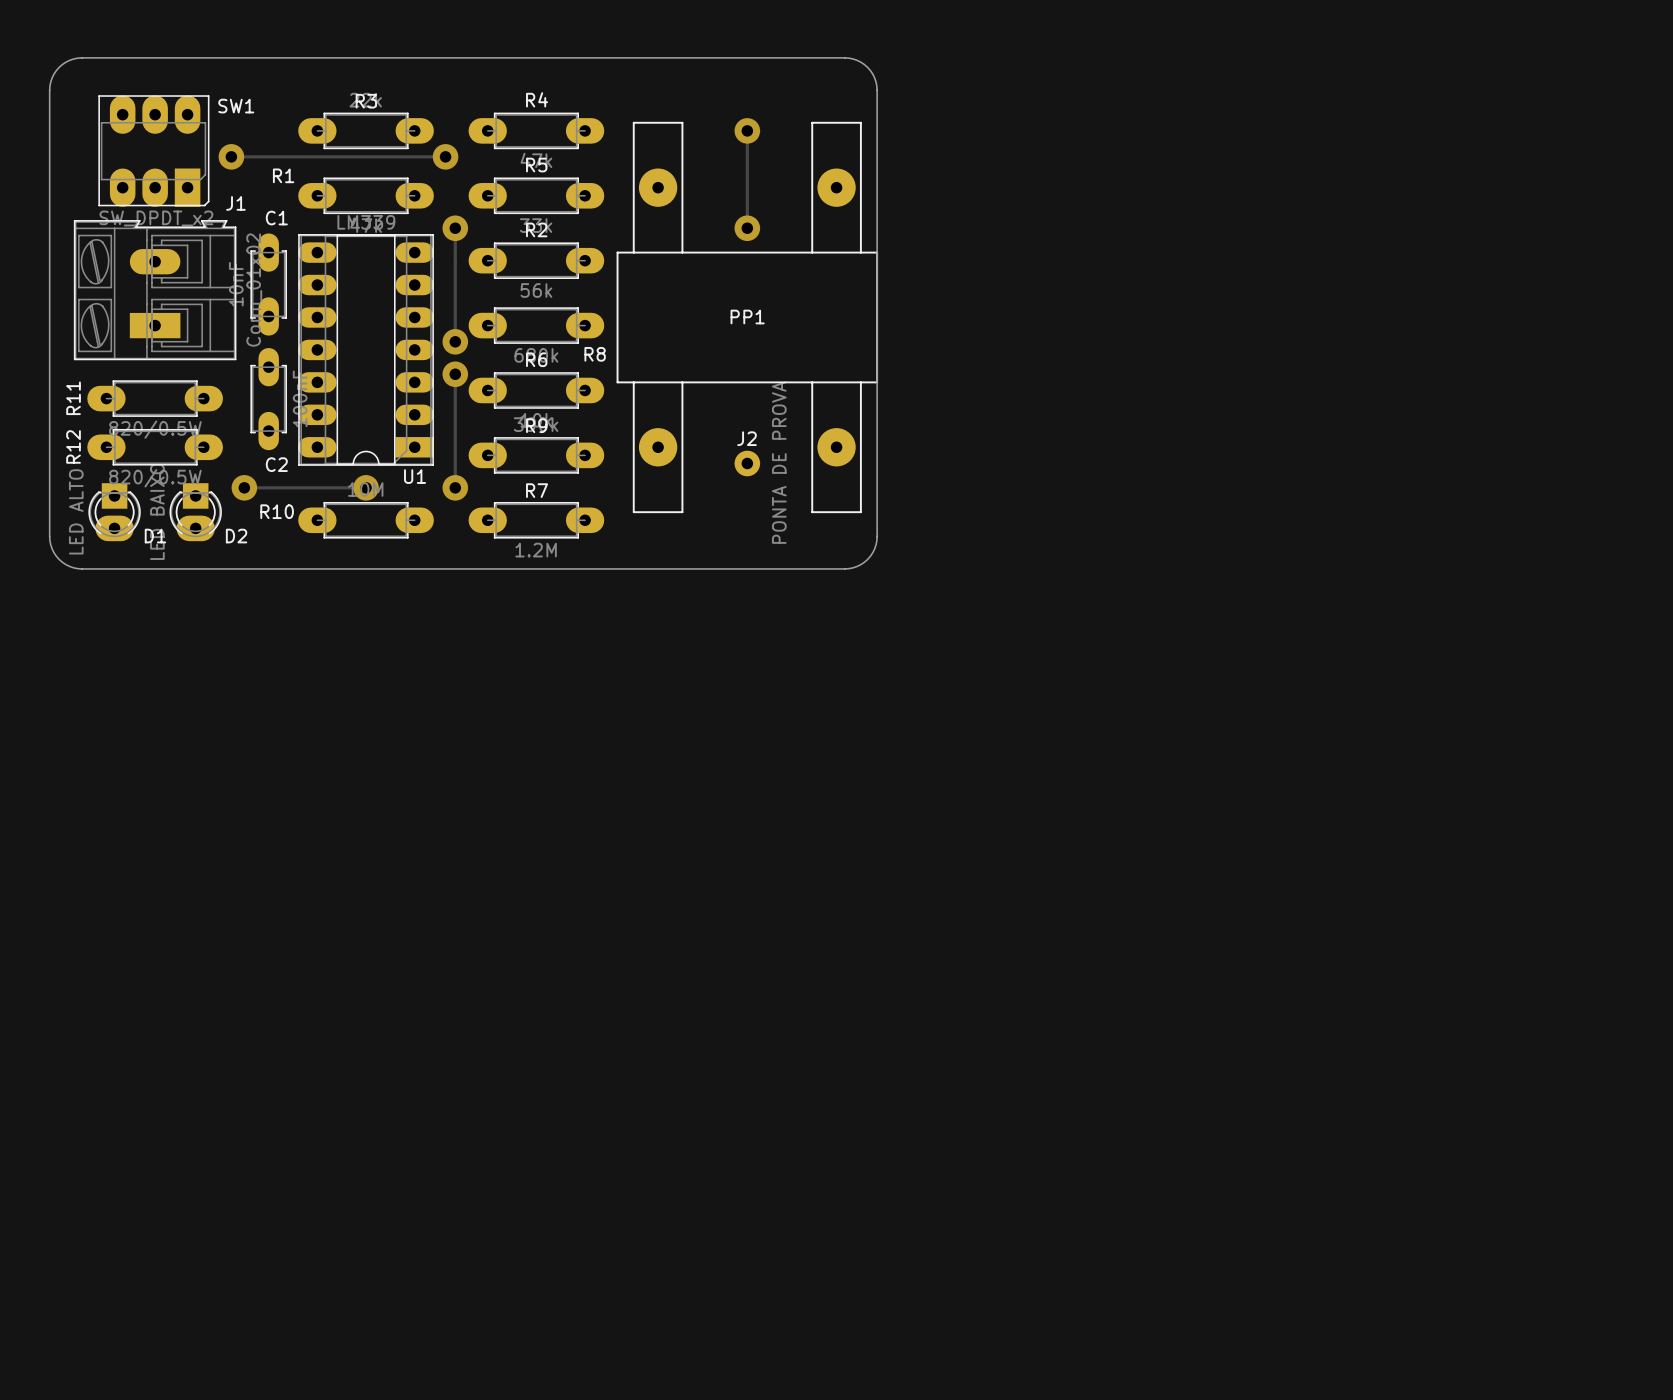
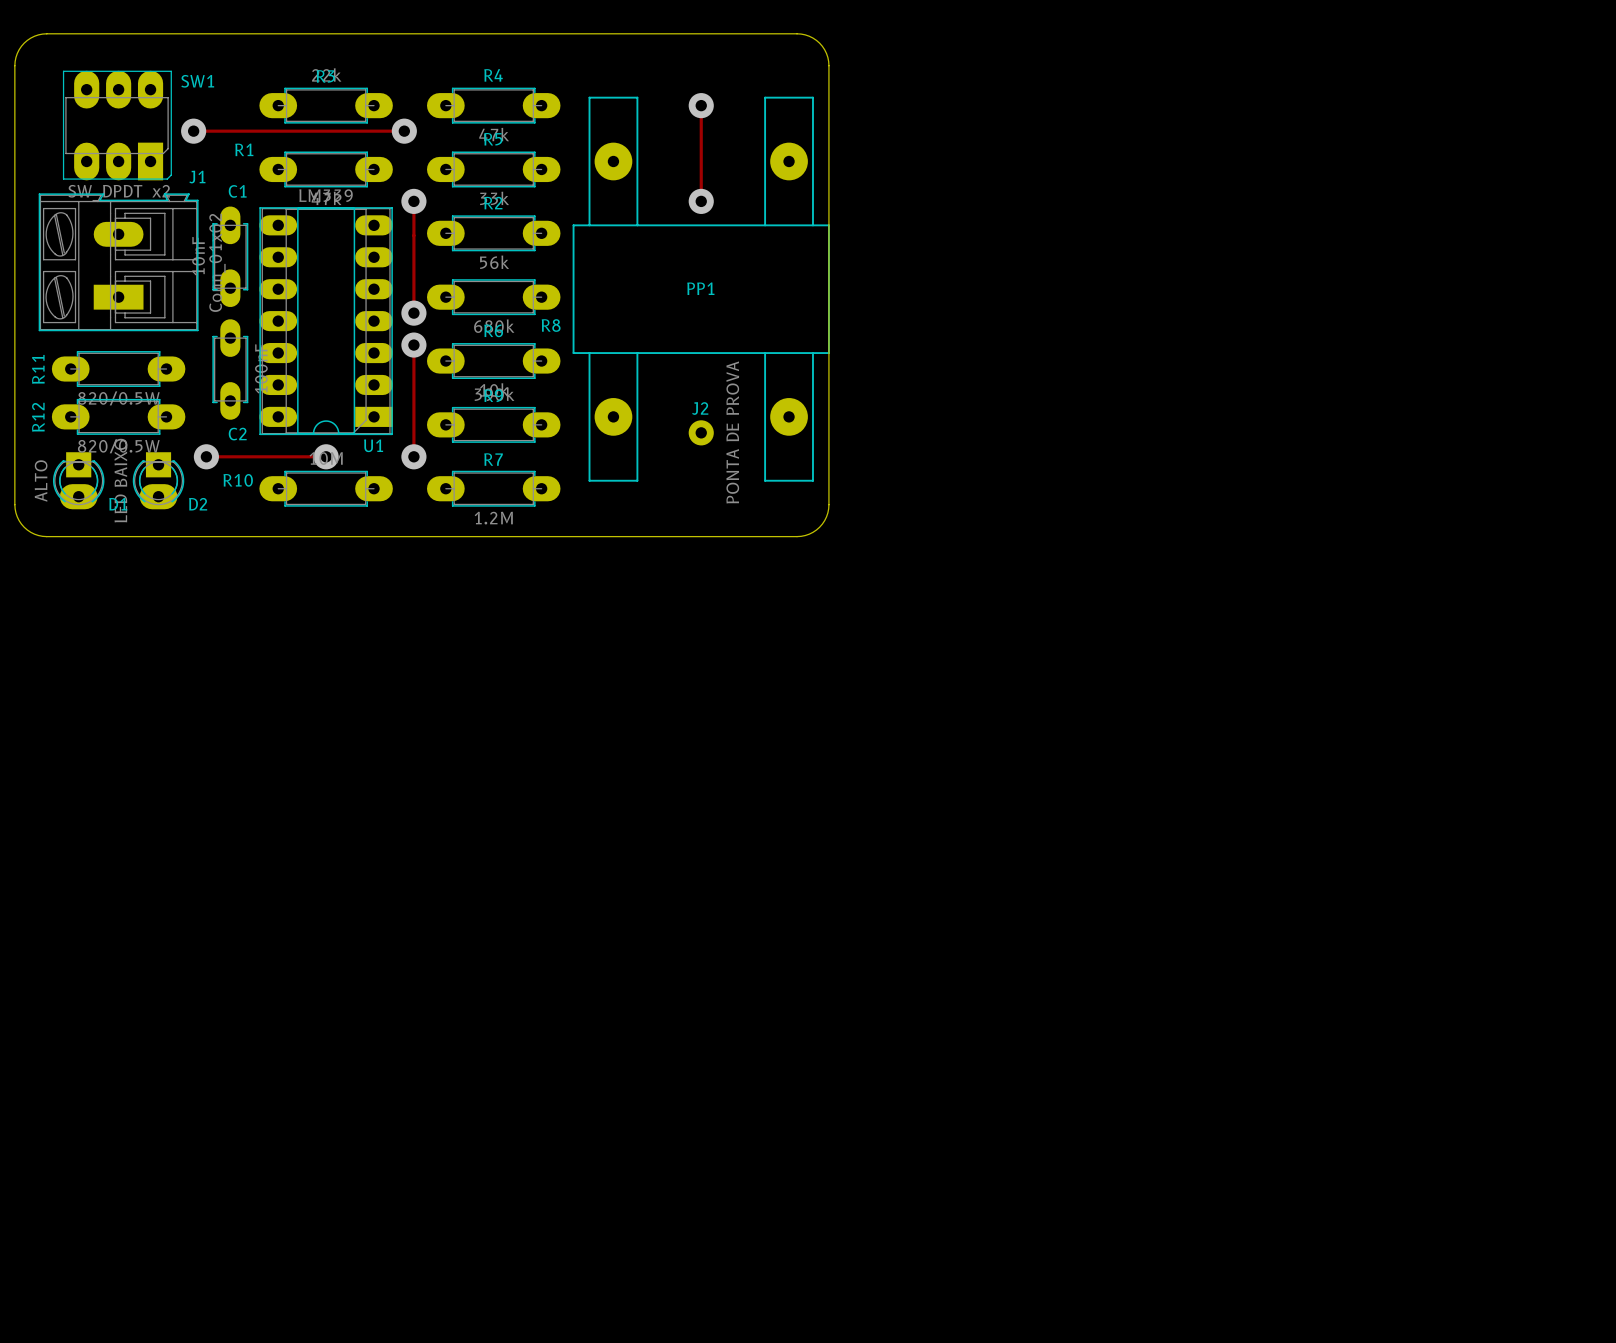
D1 value: LED ALTO (76, 511) -> ALTO (41, 481)

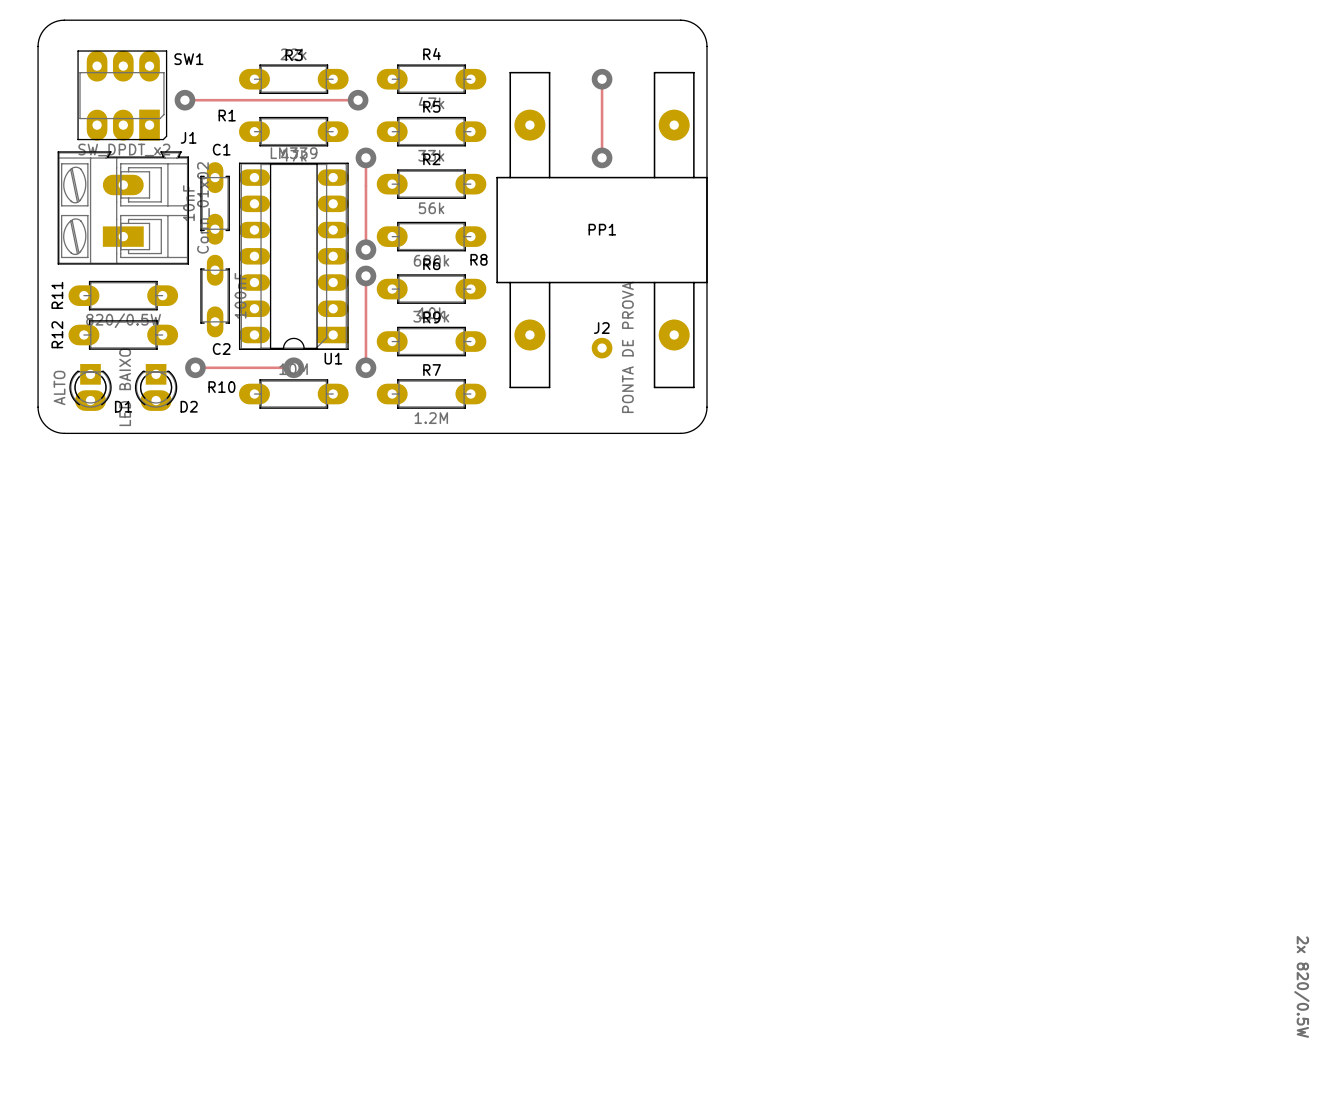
R12 value: 820/0.5W (118, 446) -> none
text: none -> 2x 820/0.5W (1301, 986)

